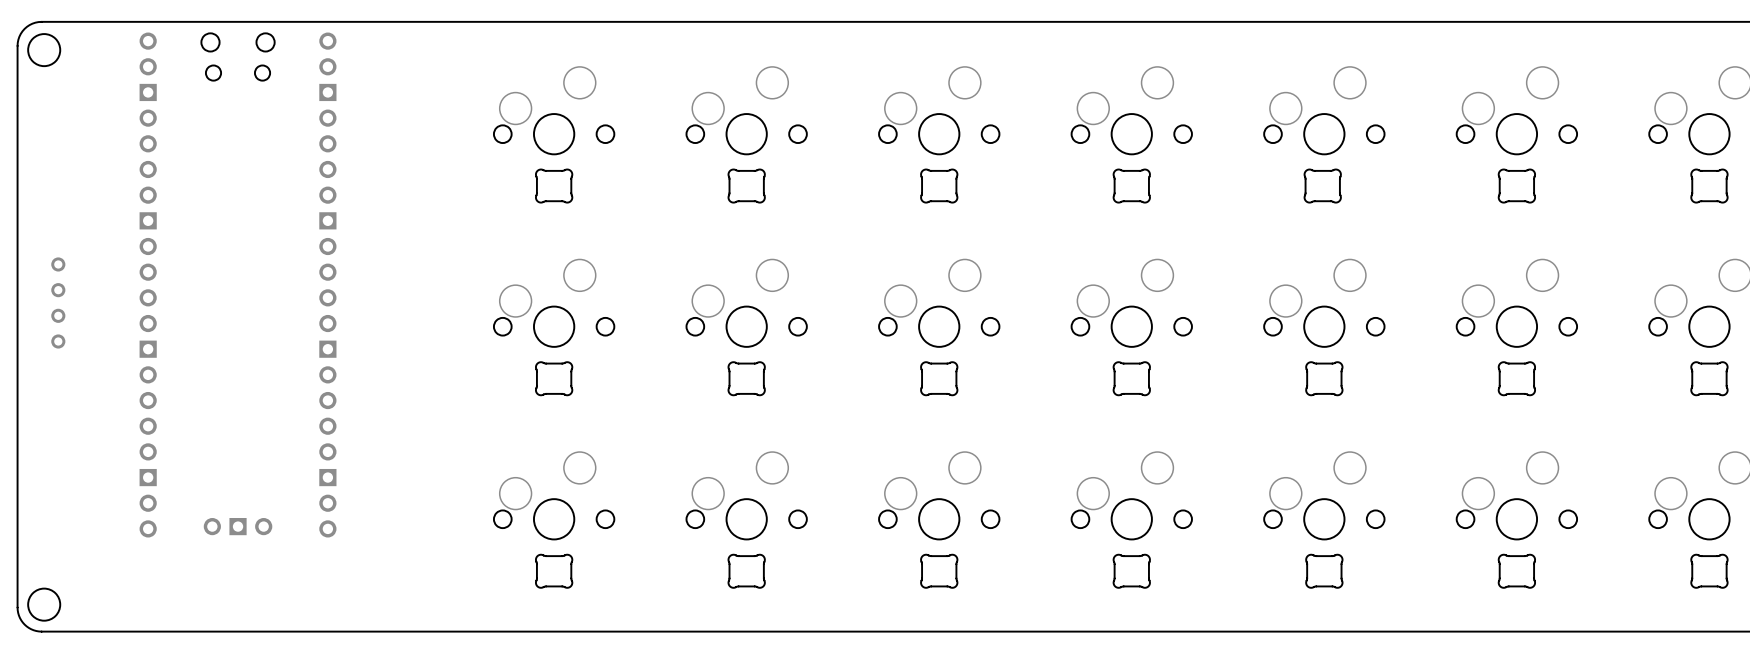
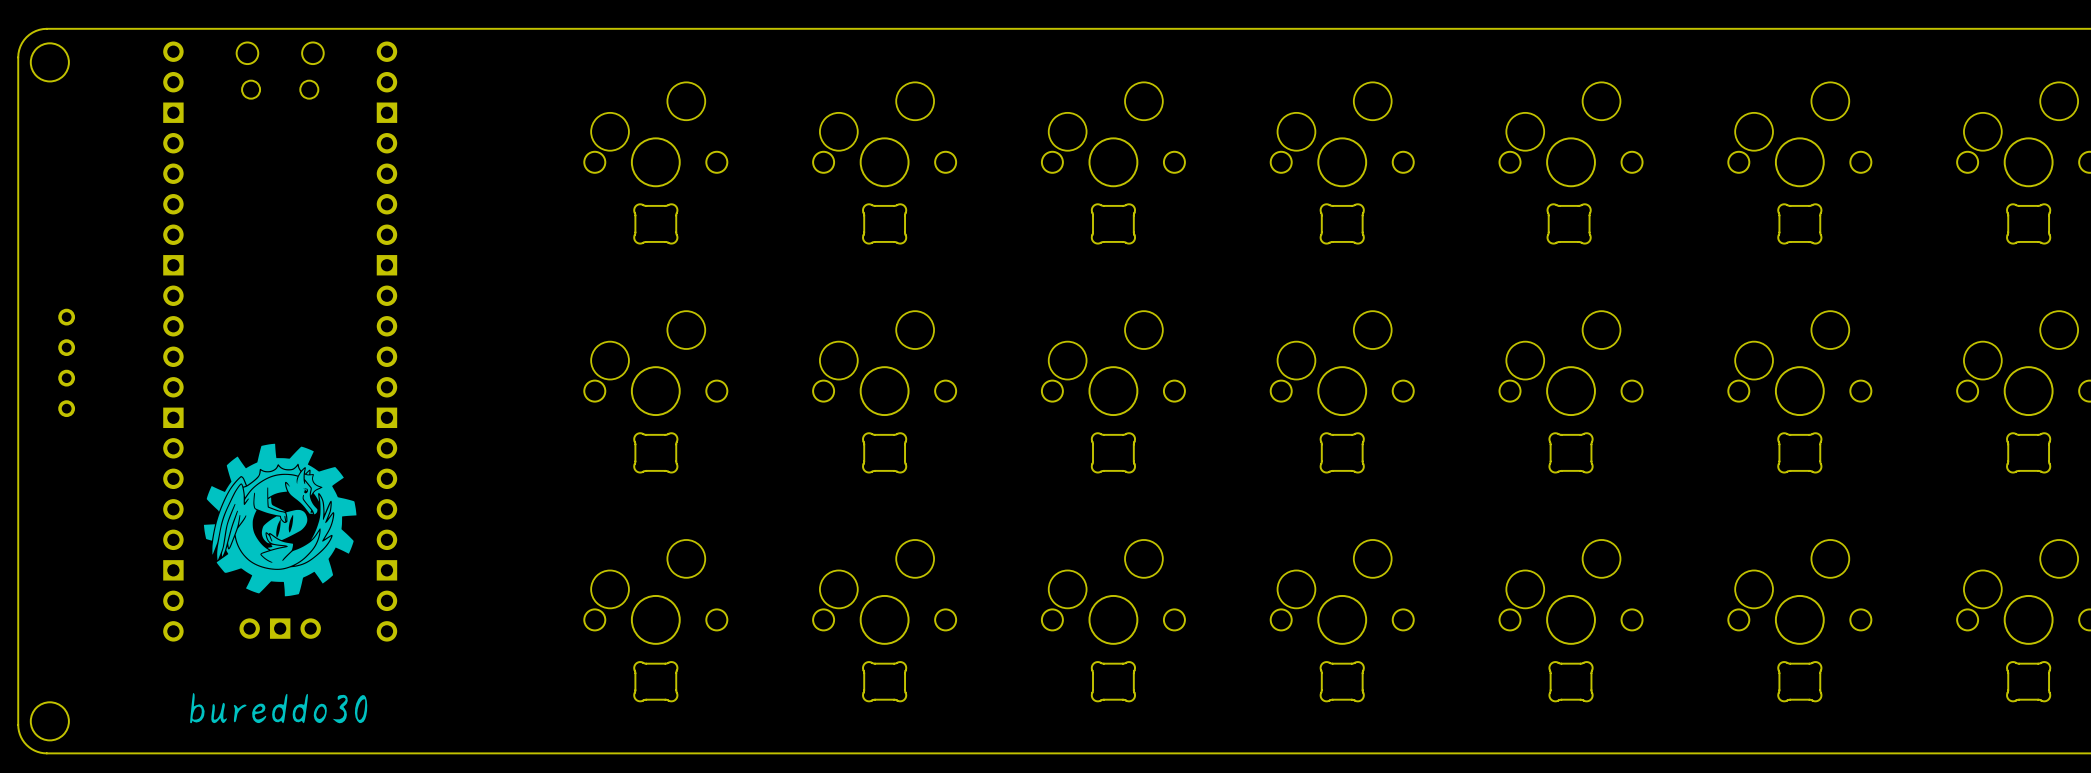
drawing: none -> [203, 443, 357, 597]
drawing: none -> [190, 693, 368, 724]

